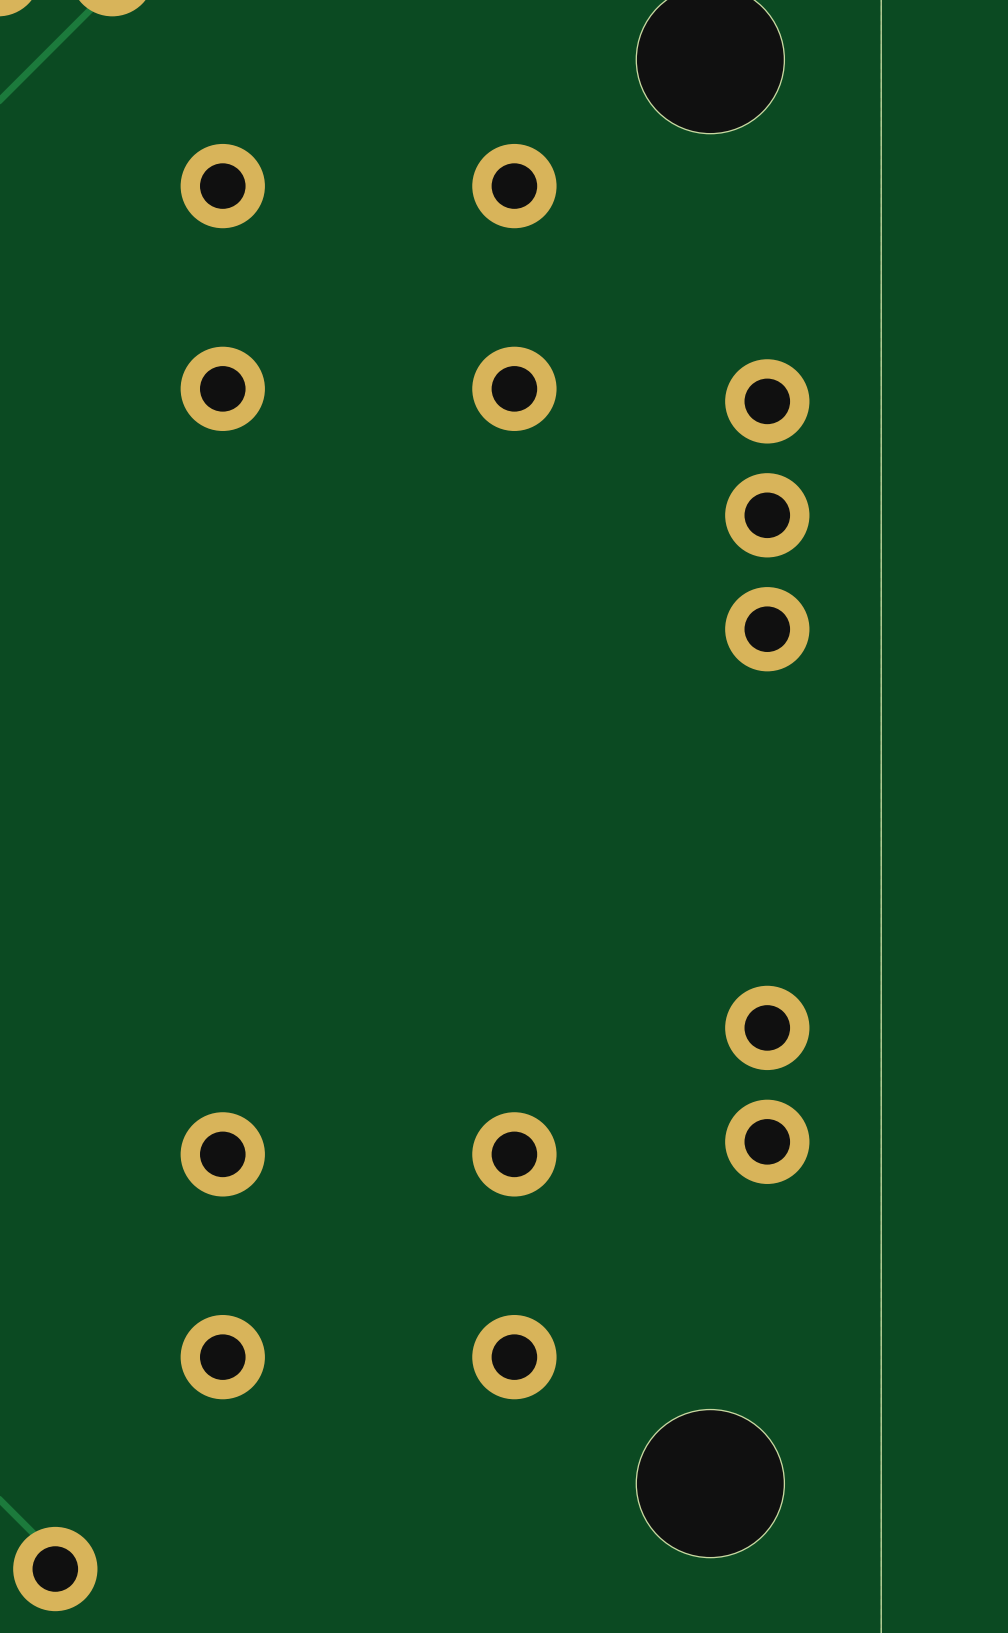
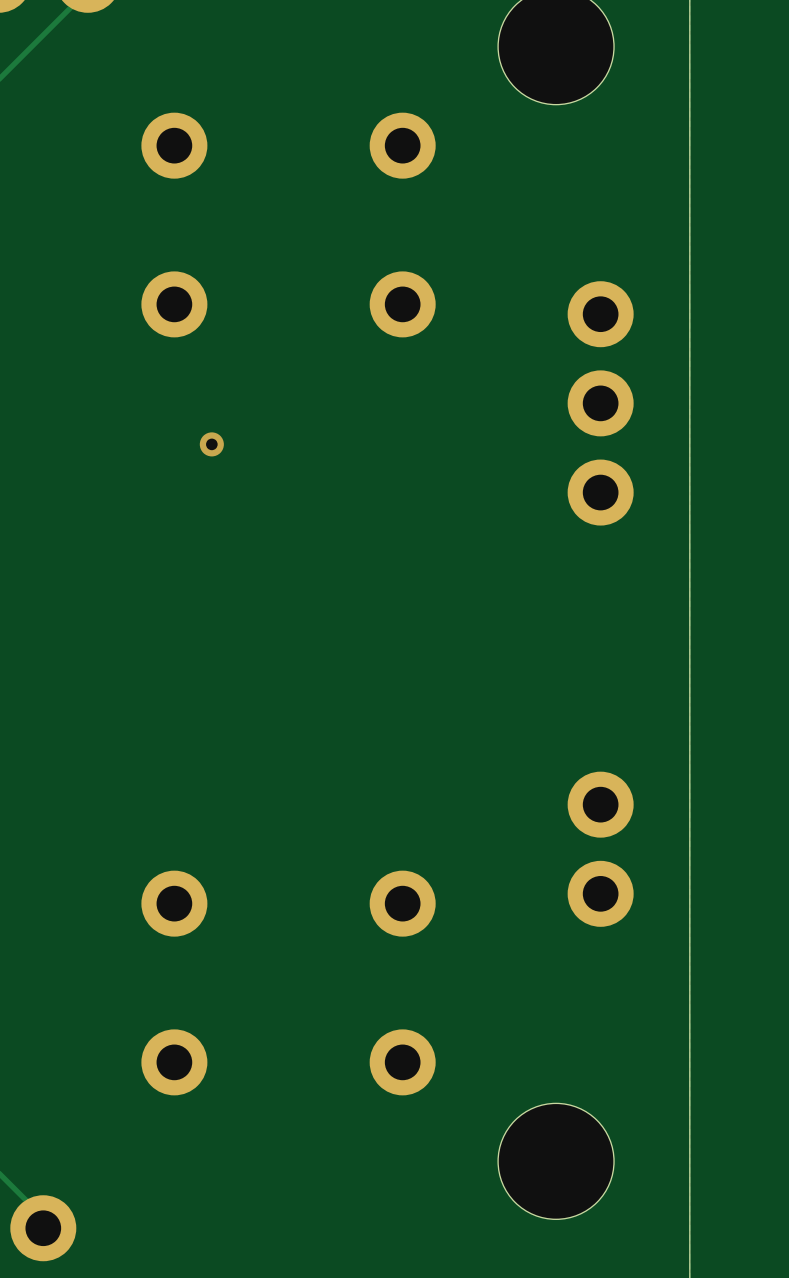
via: none -> (211, 444)

